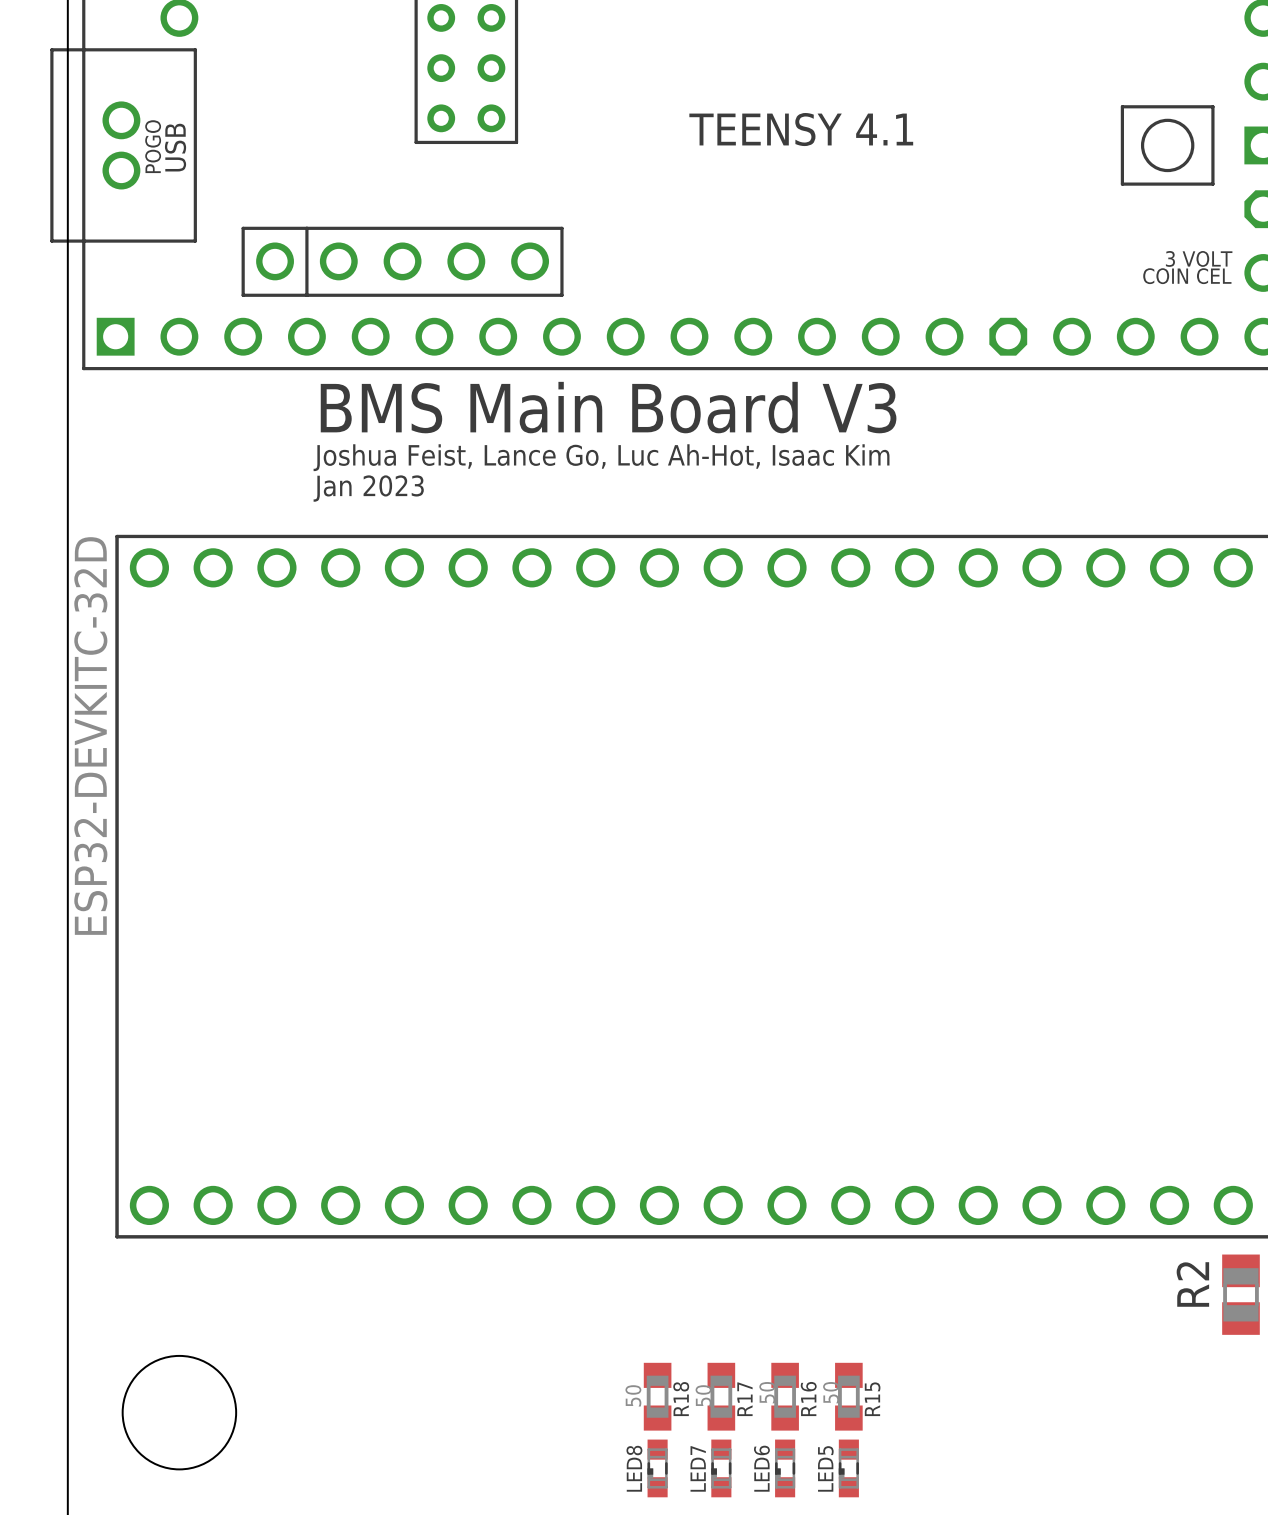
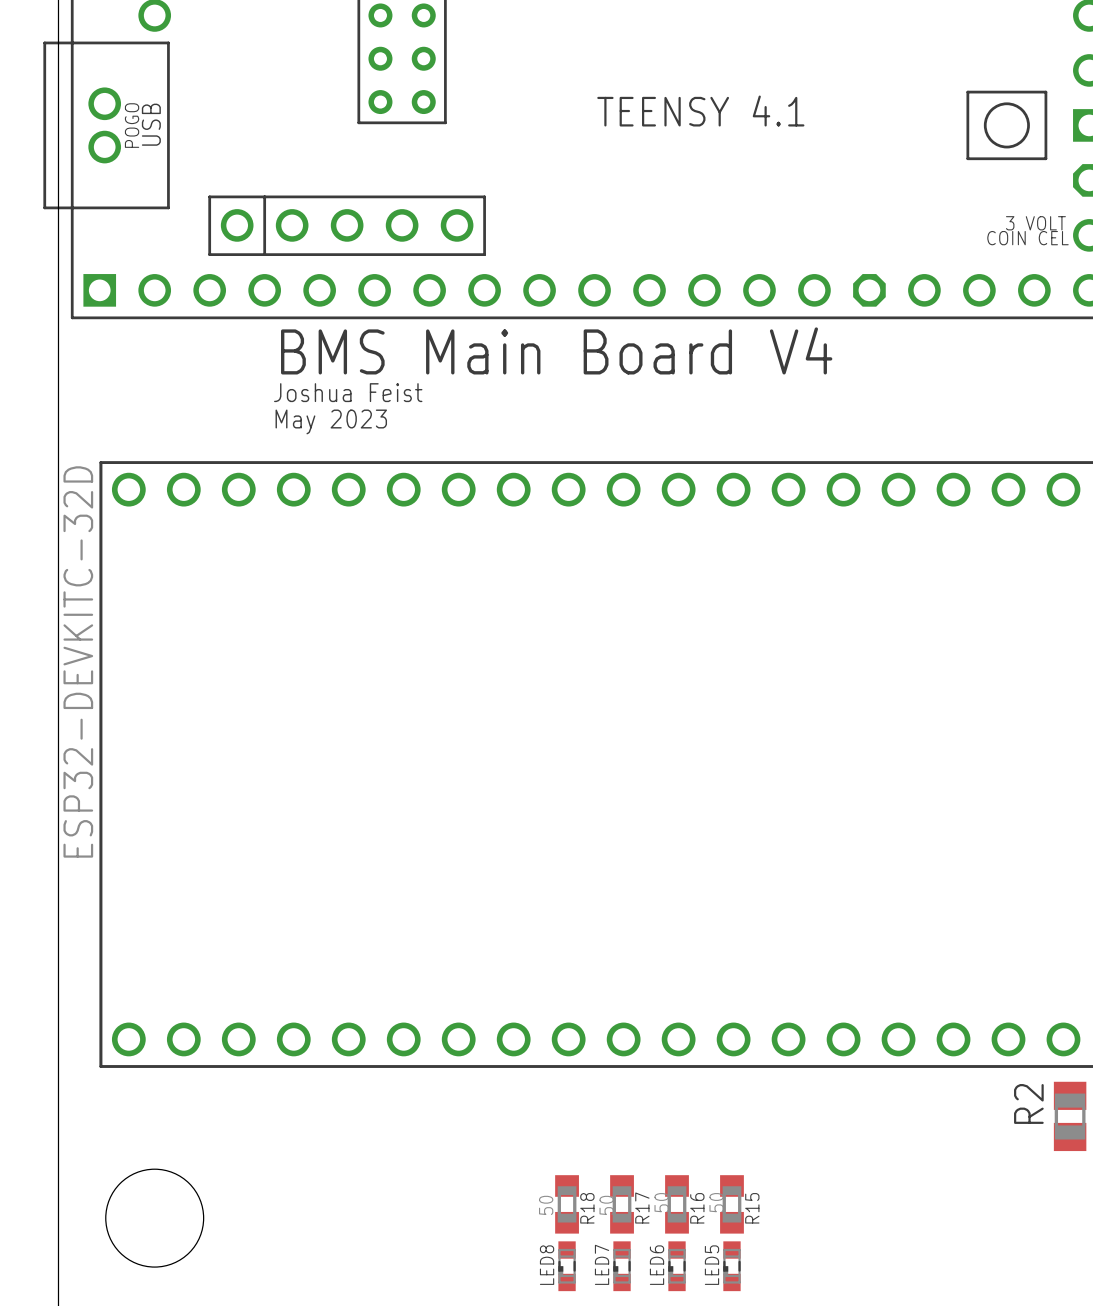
text: BMS Main Board V3 (608, 407) -> BMS Main Board V4 (556, 350)
text: Joshua Feist, Lance Go, Luc Ah-Hot, Isaac Kim (601, 457) -> Joshua Feist (348, 392)
text: Jan 2023 (368, 488) -> May 2023 (331, 421)

